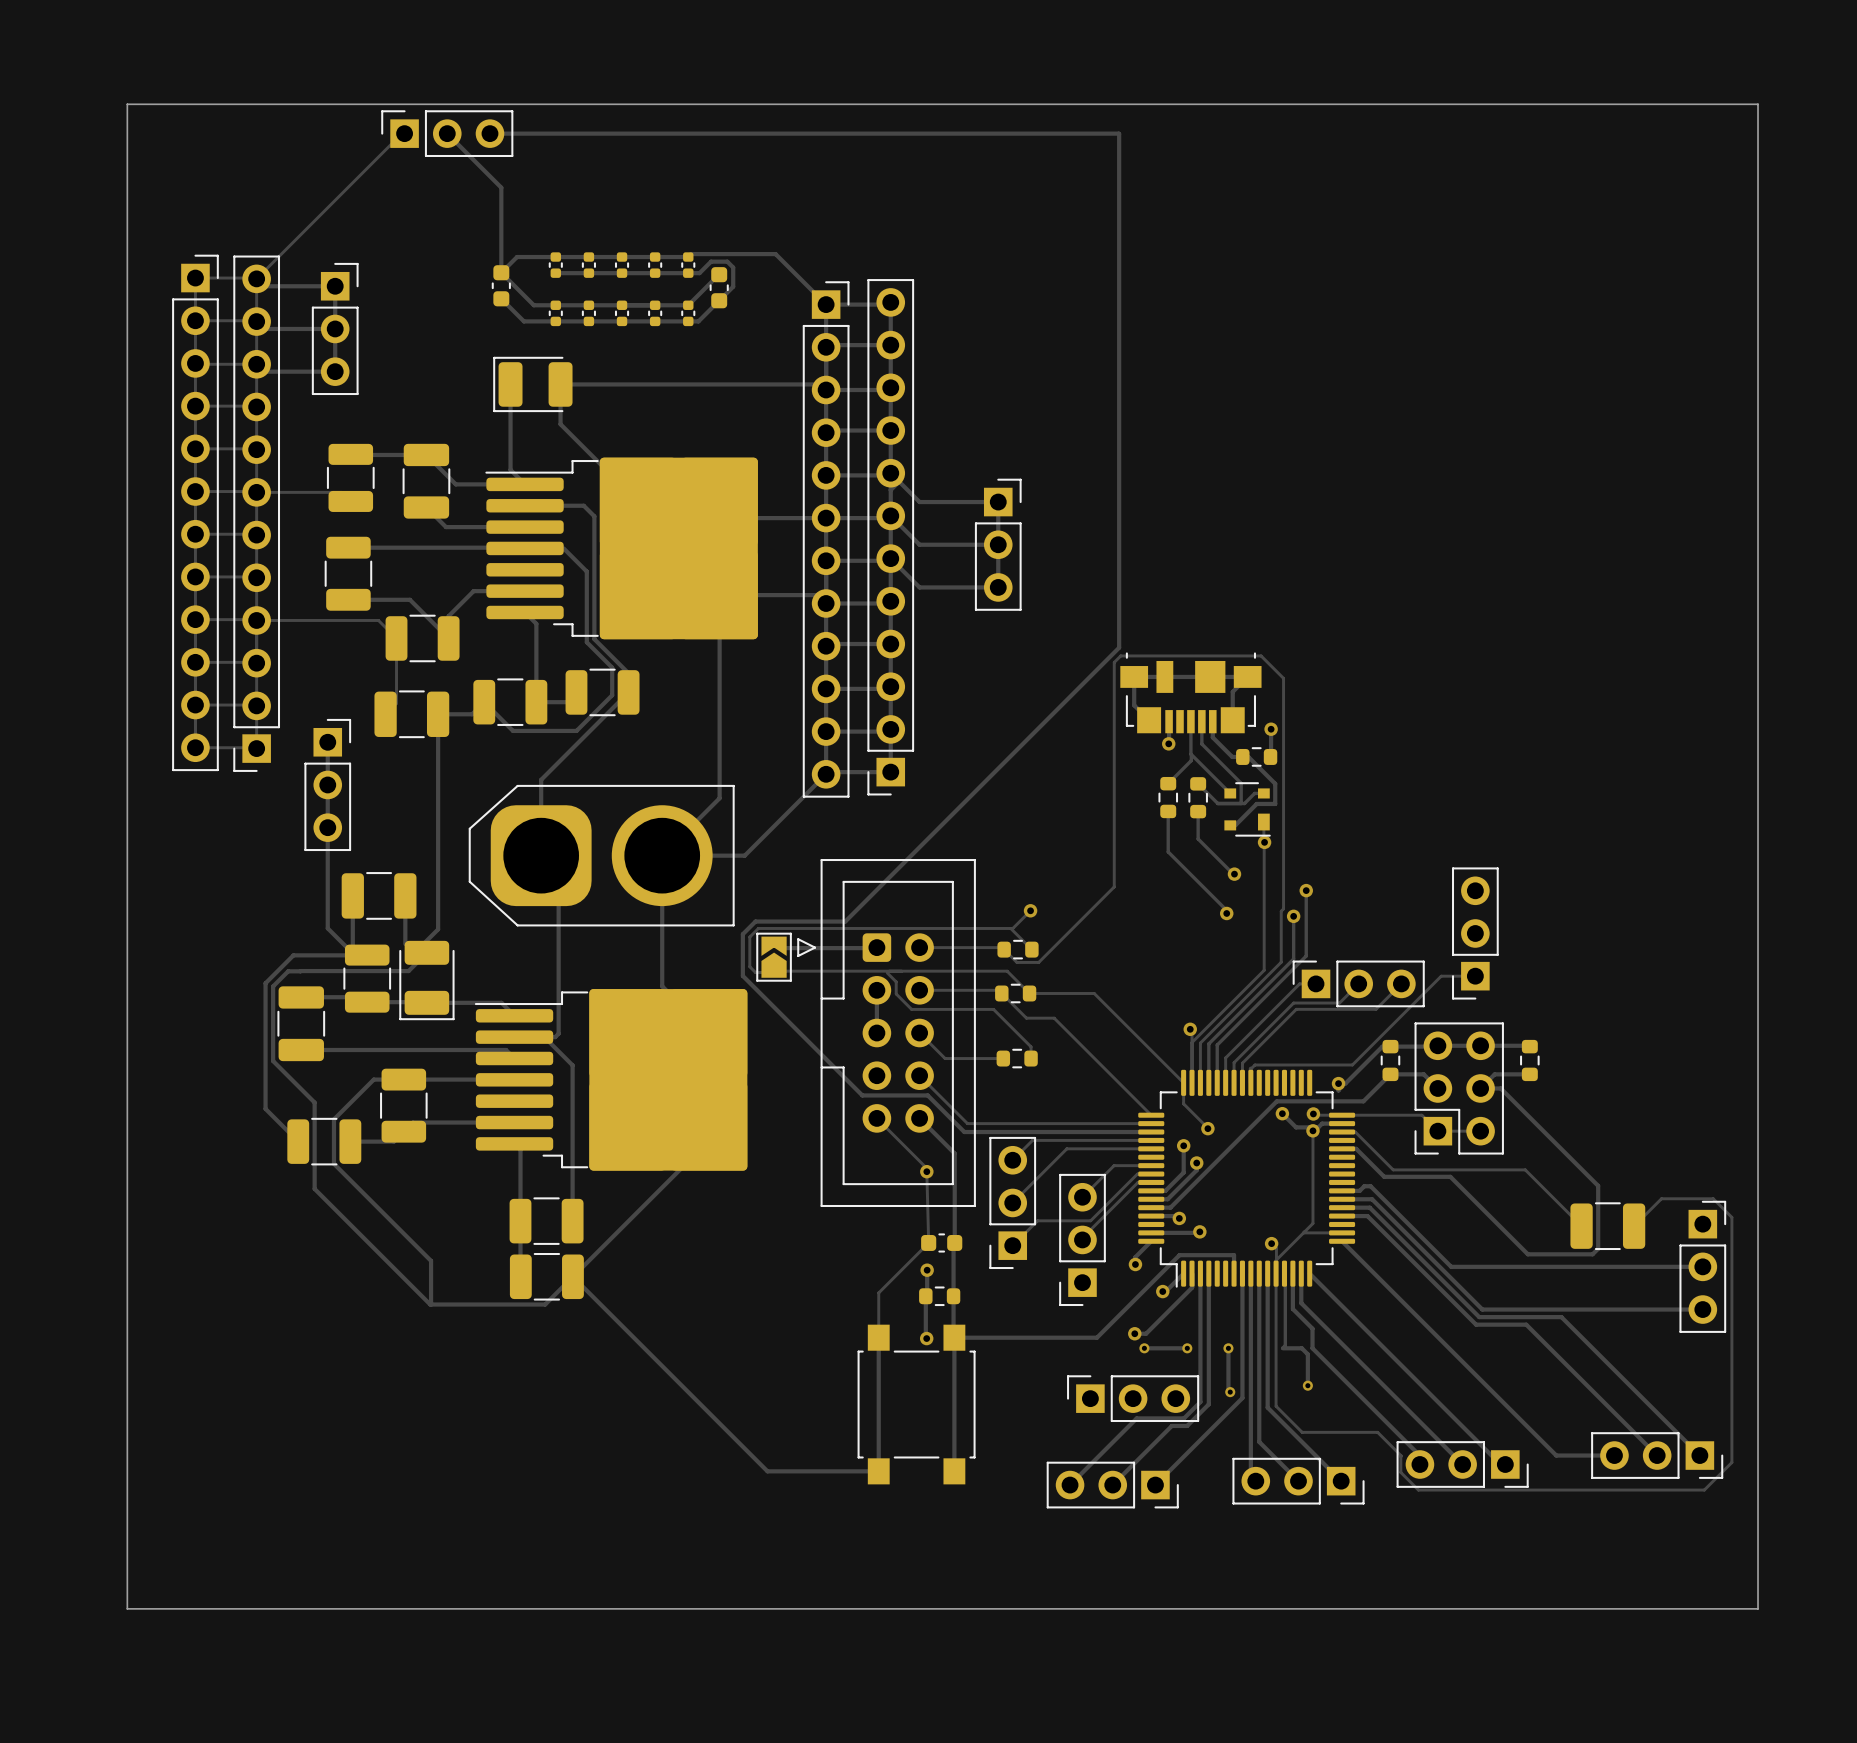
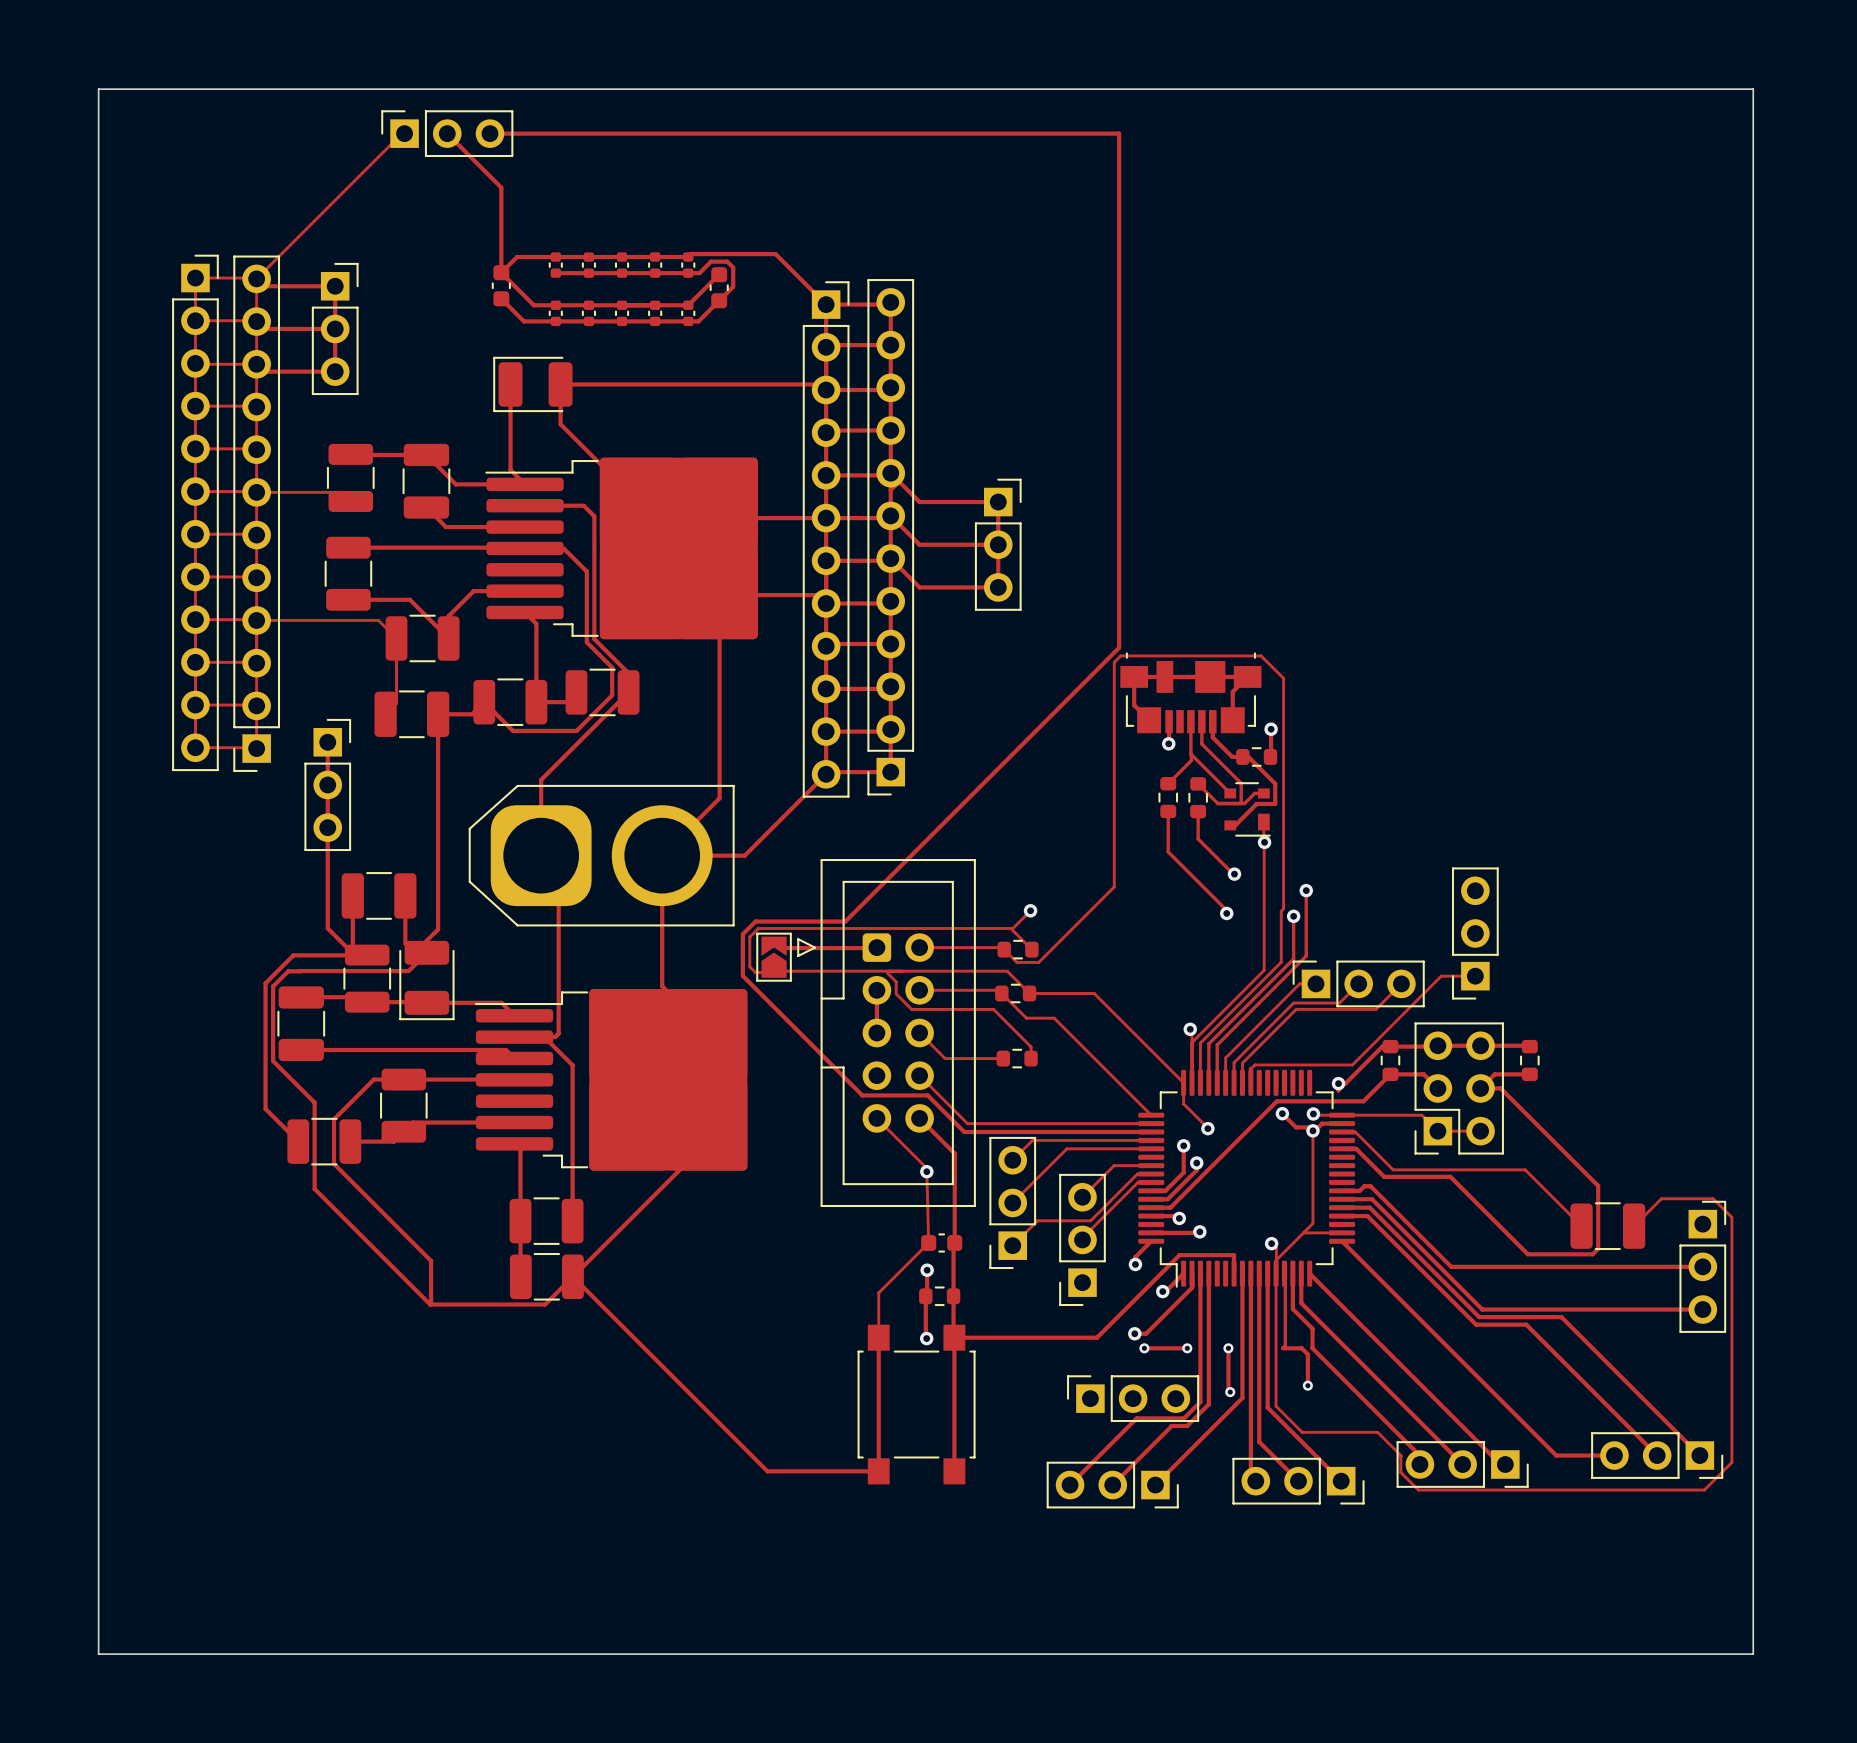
board edge: (127, 104) (1758, 104) (1758, 1608) (127, 1608) (127, 104) -> (98, 89) (98, 1654) (1753, 1654) (1753, 89) (98, 89)

